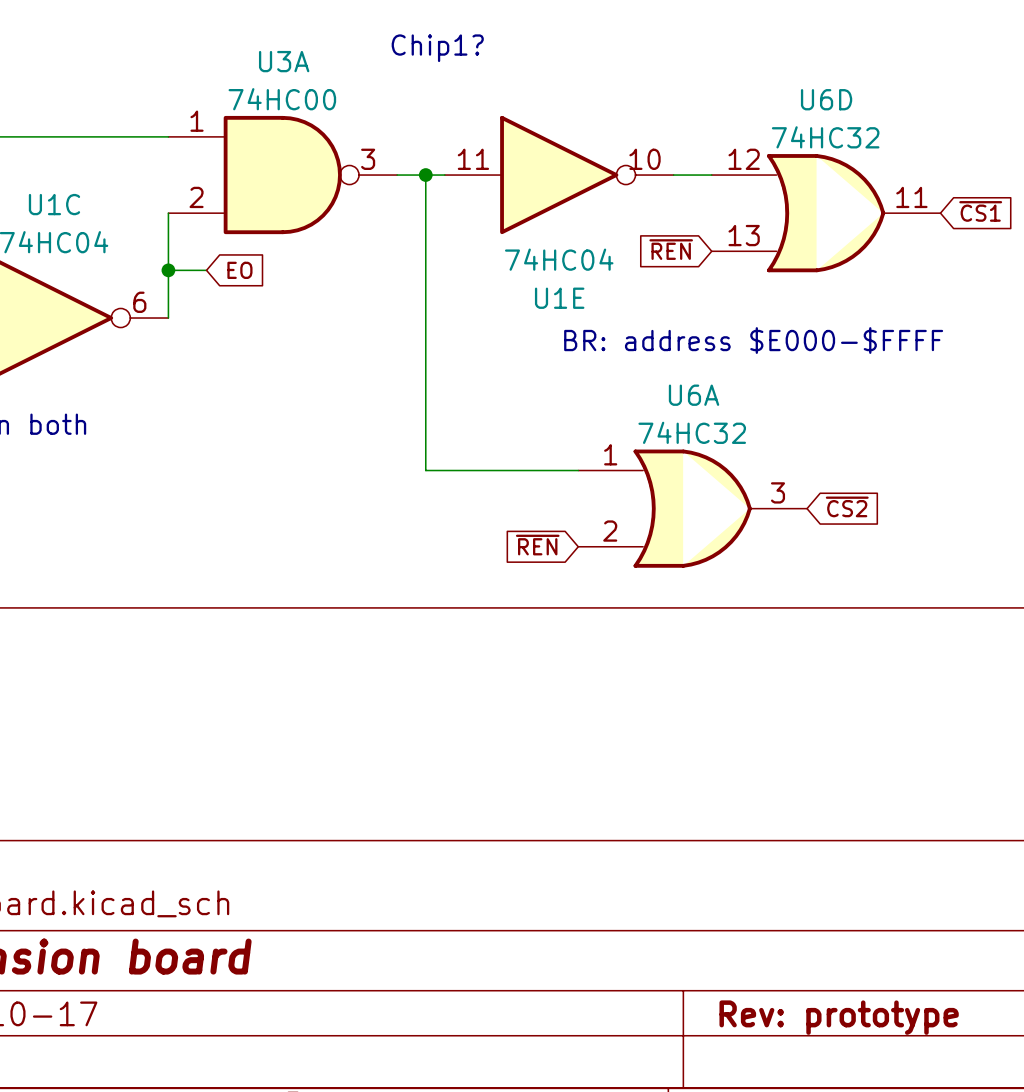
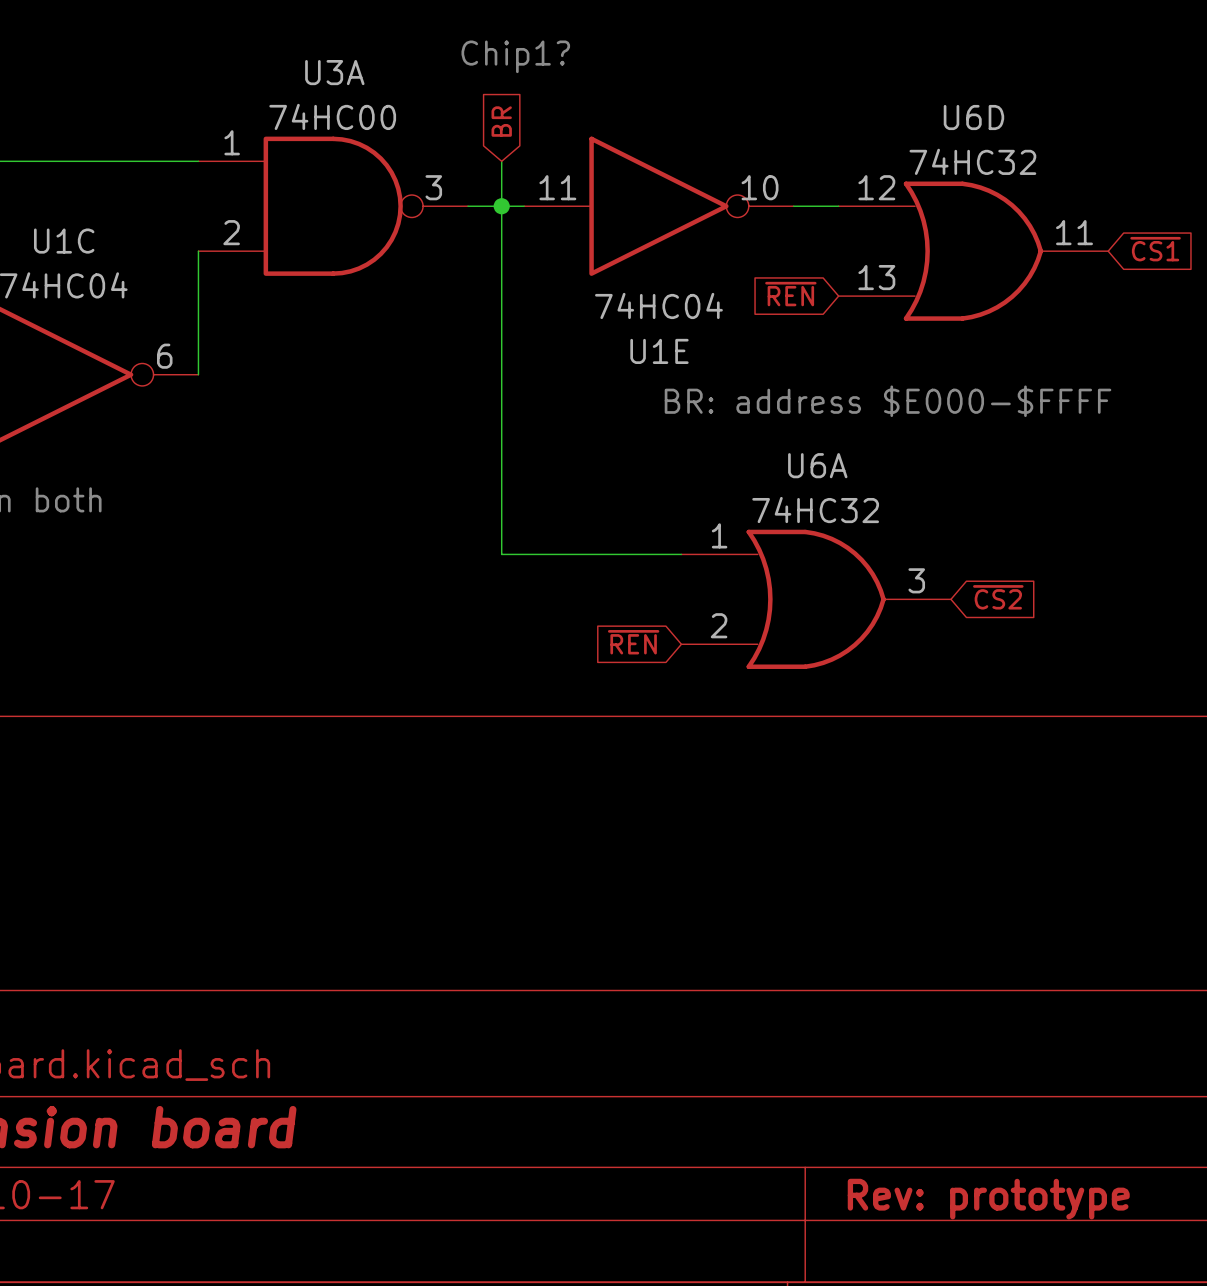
global label: none -> BR (501, 121)
wire: none -> (501, 161) (501, 206)
wire: (168, 270) (206, 270) -> none
junction: (168, 270) -> none
global label: EO (239, 270) -> none

